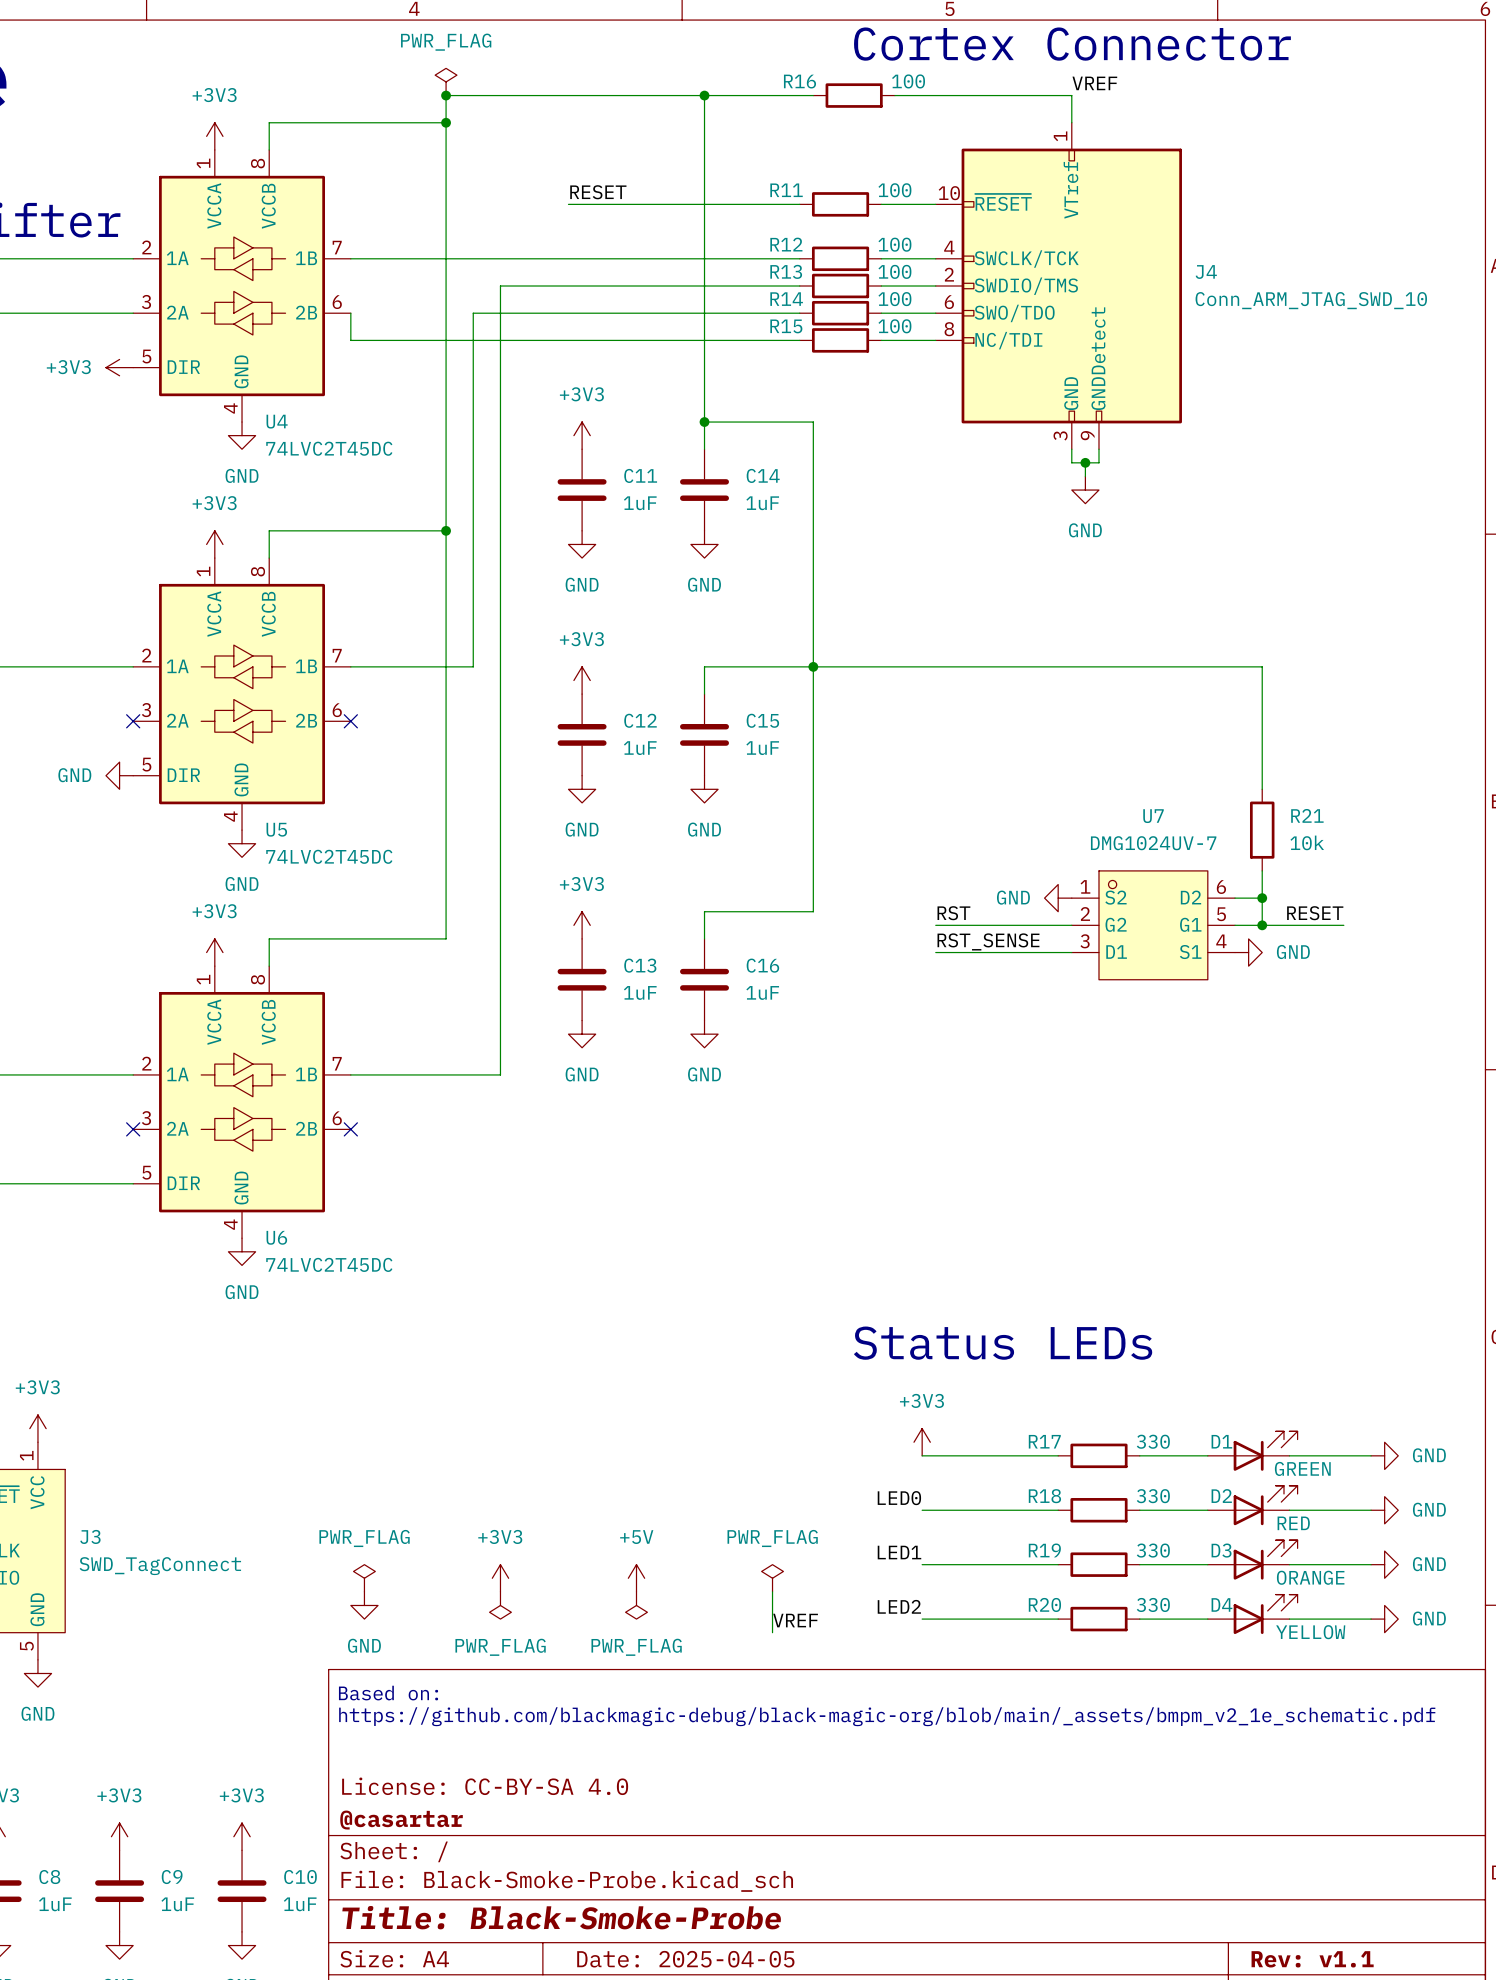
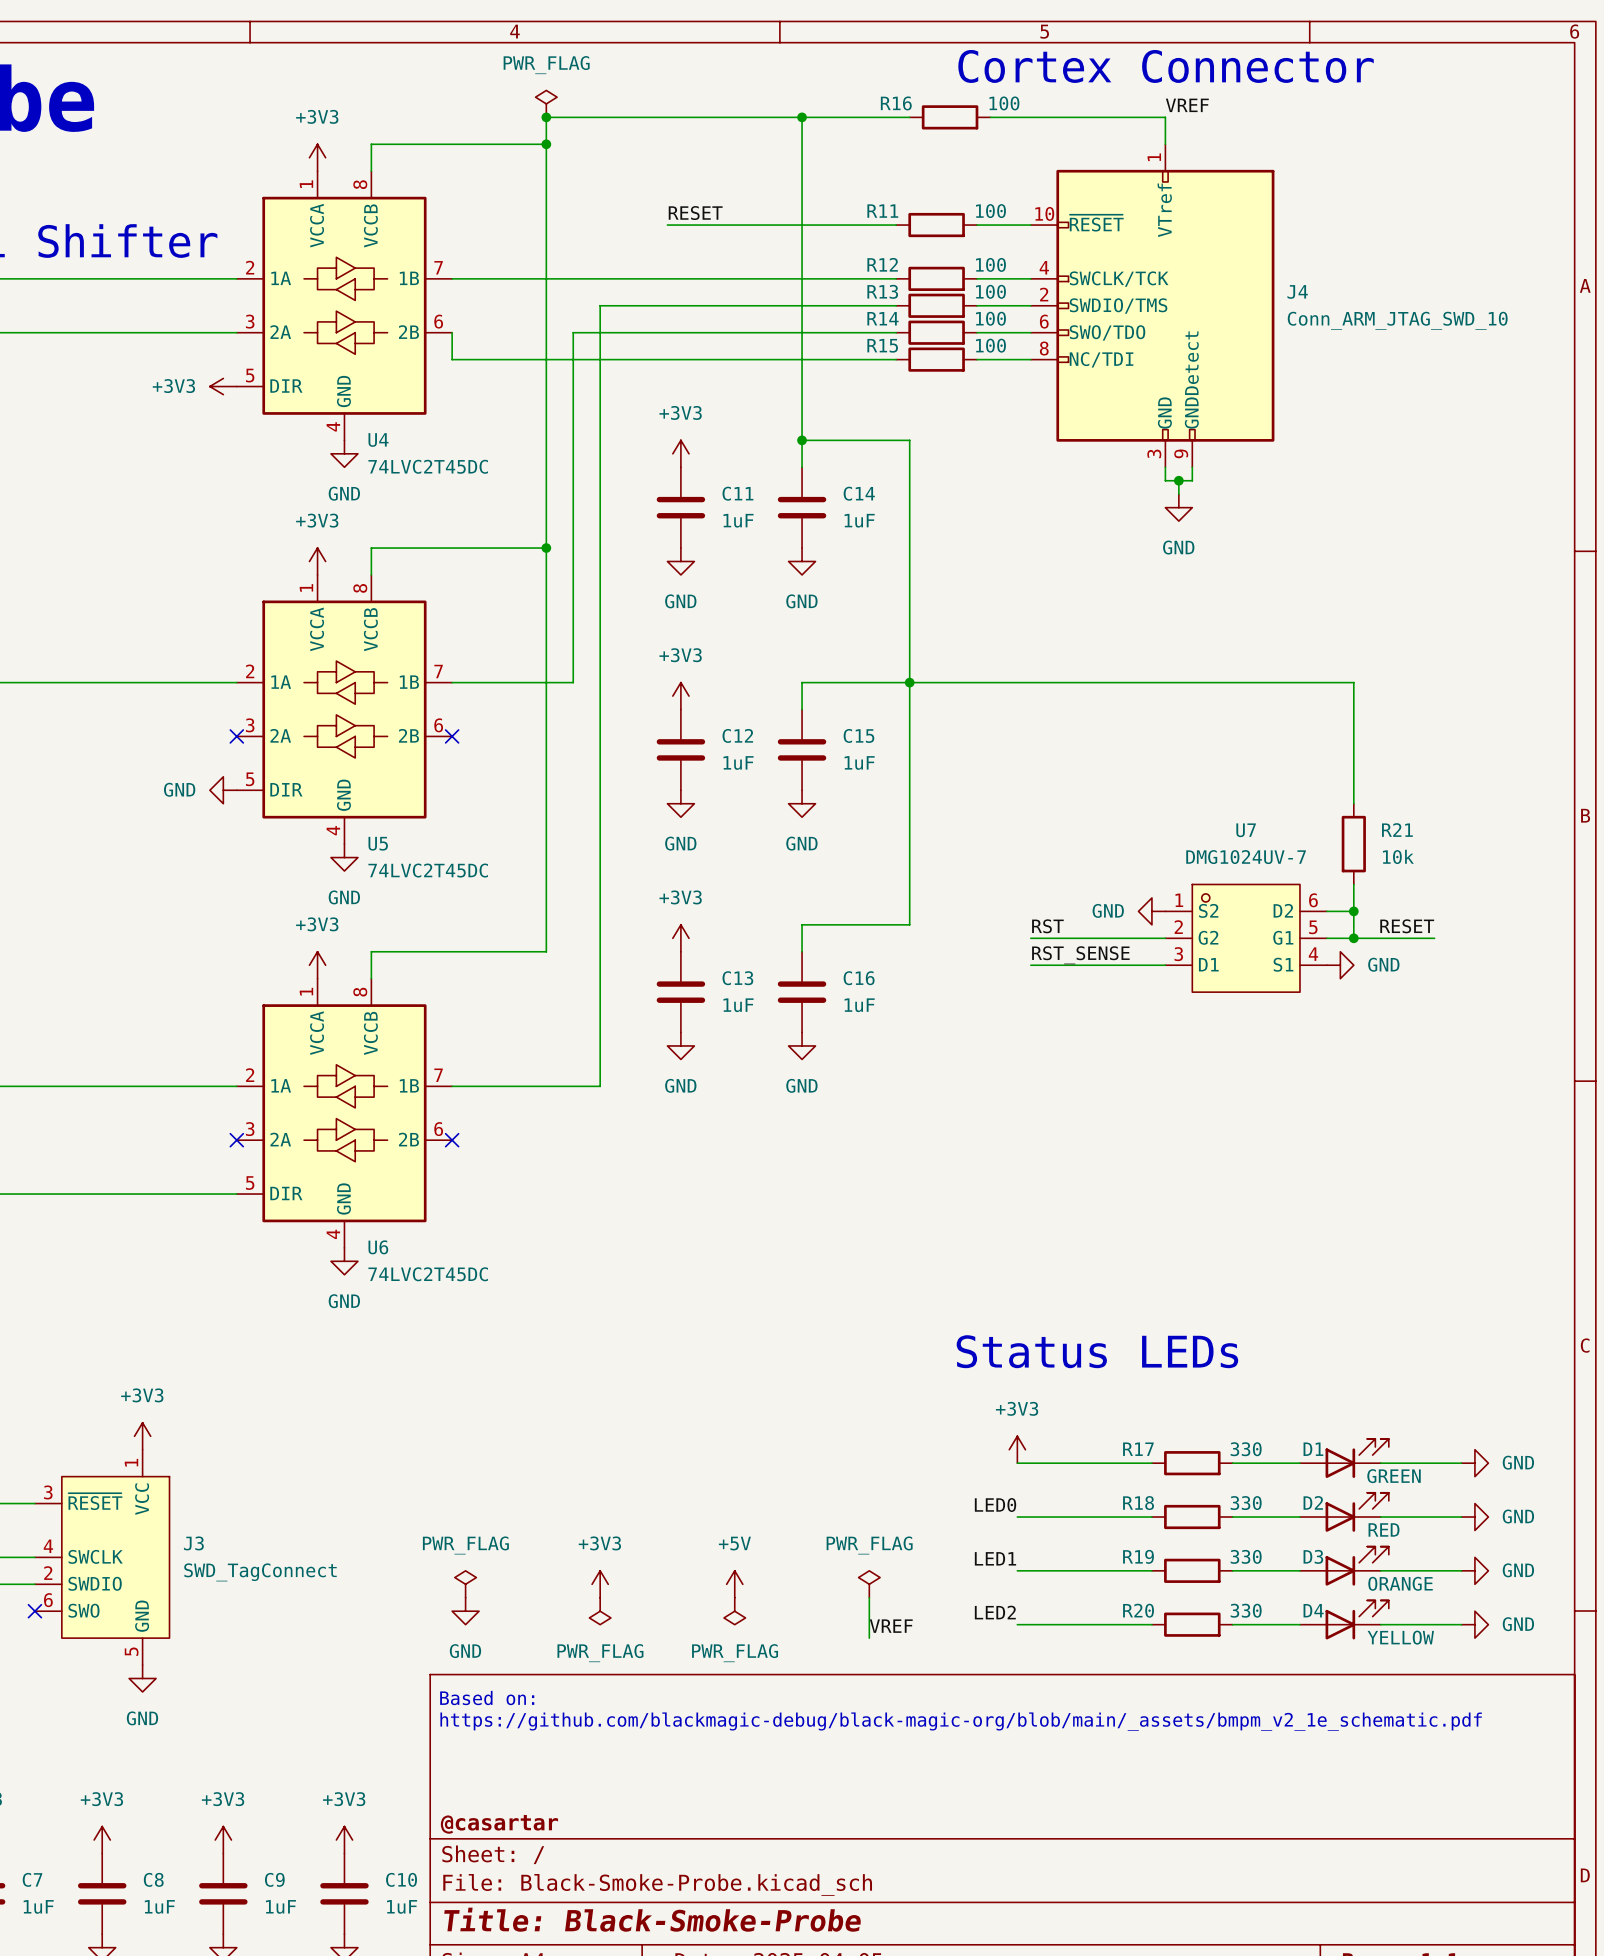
title block: License: CC-BY-SA 4.0 (485, 1786) -> none

